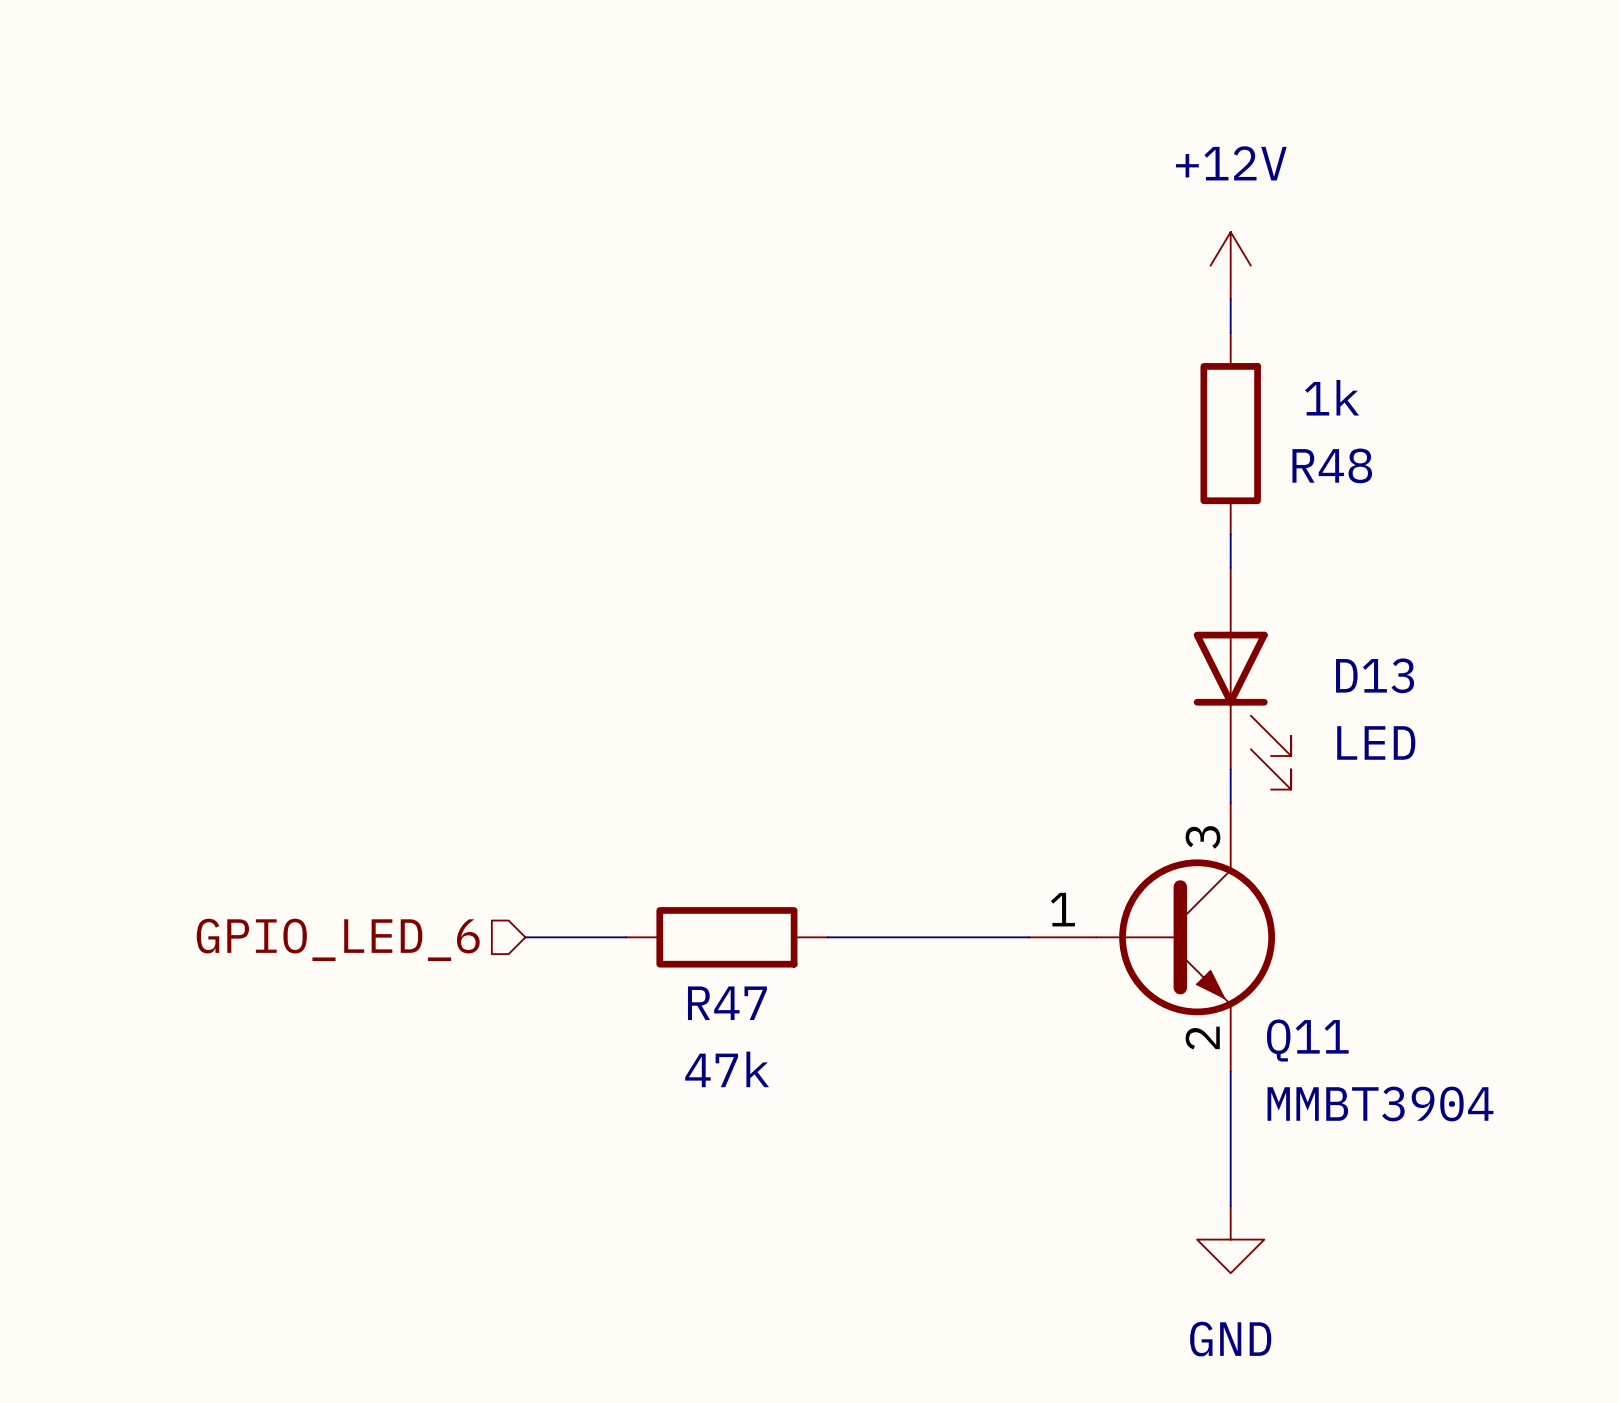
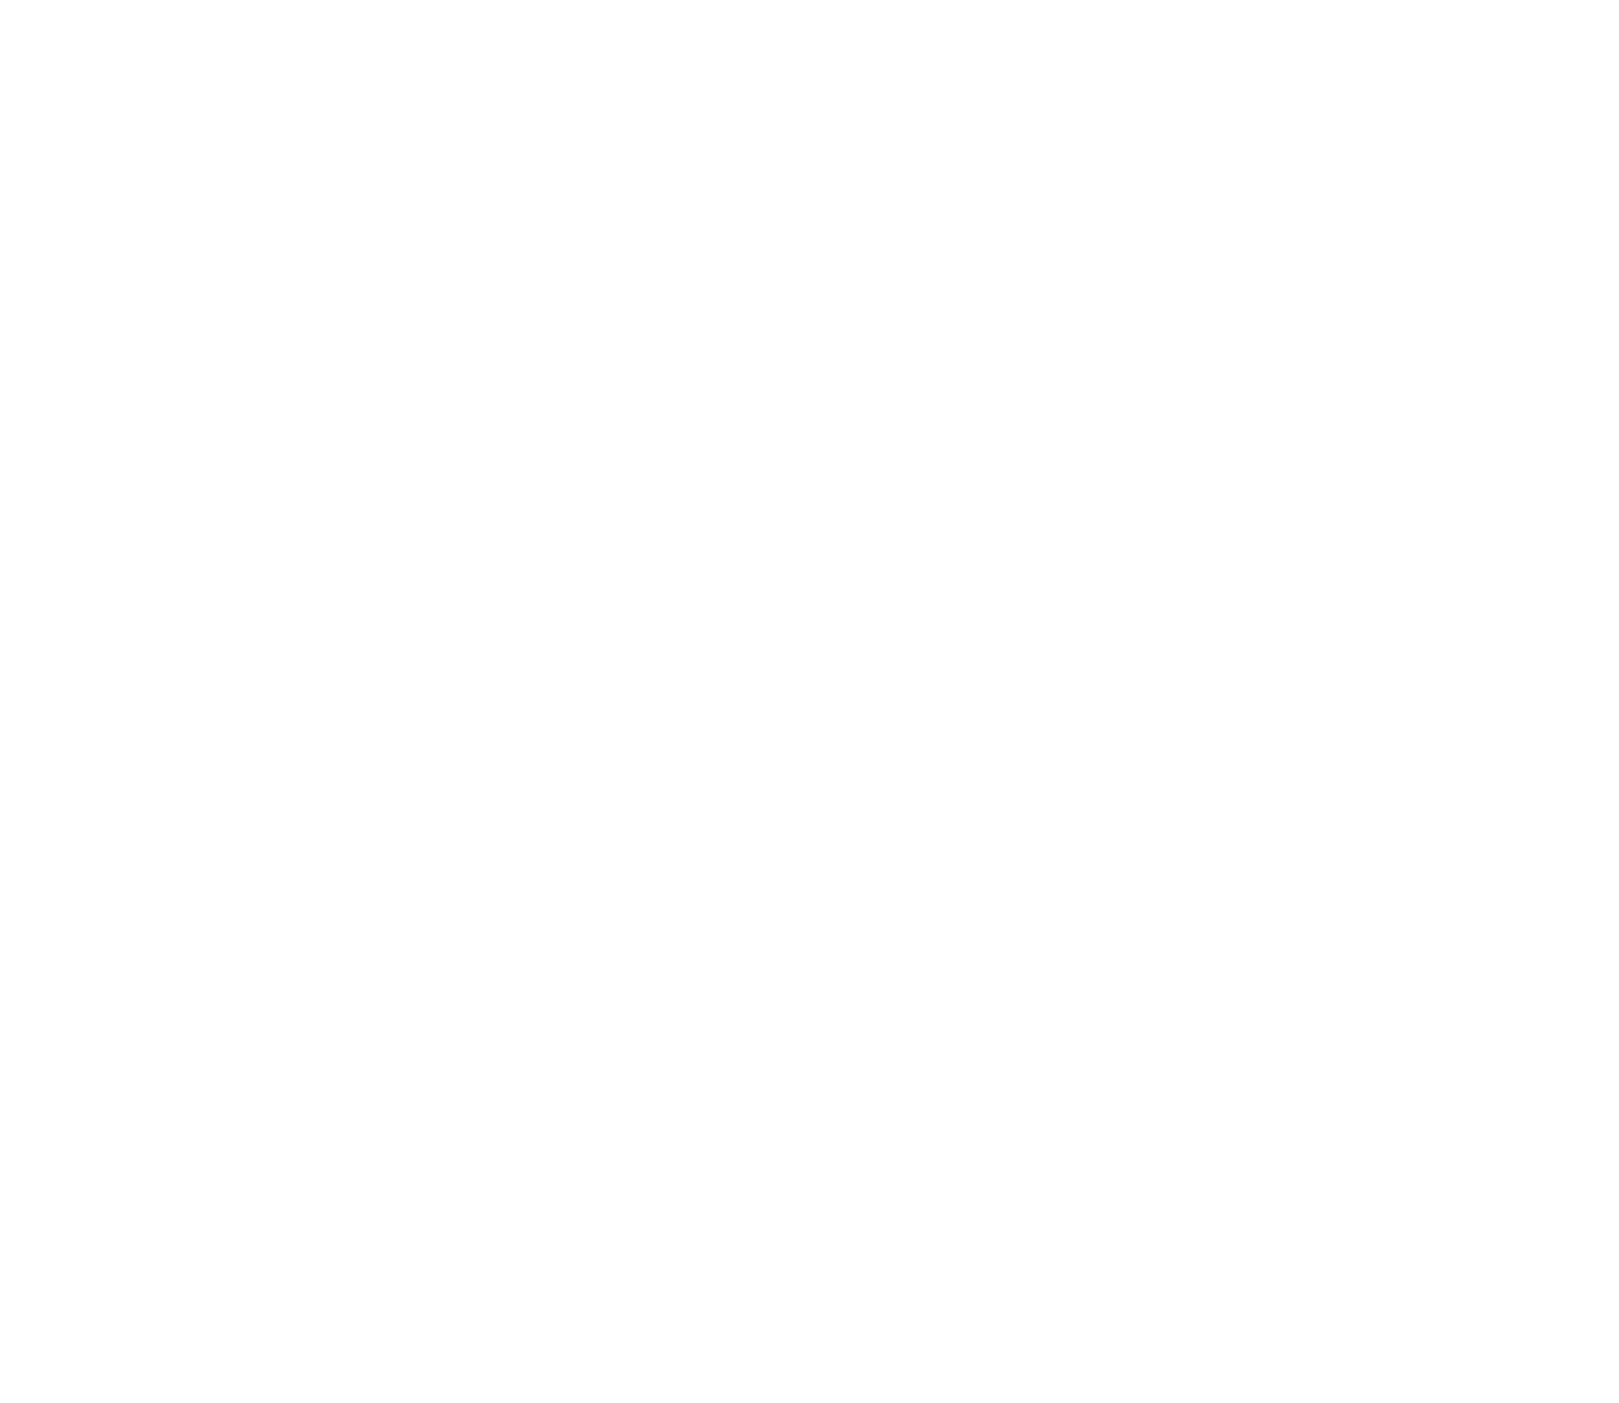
power symbol: +12V (1230, 265) -> none
wire: (1230, 299) (1230, 332) -> none
R48: 1k (1230, 433) -> none
wire: (1230, 534) (1230, 567) -> none
D13: LED (1242, 678) -> none
wire: (1230, 769) (1230, 803) -> none
wire: (525, 937) (626, 937) -> none
R47: 47k (726, 937) -> none
wire: (827, 937) (1029, 937) -> none
Q11: MMBT3904 (1152, 937) -> none
hierarchical label: GPIO_LED_6 (338, 939) -> none
wire: (1230, 1071) (1230, 1206) -> none
power symbol: GND (1230, 1239) -> none

